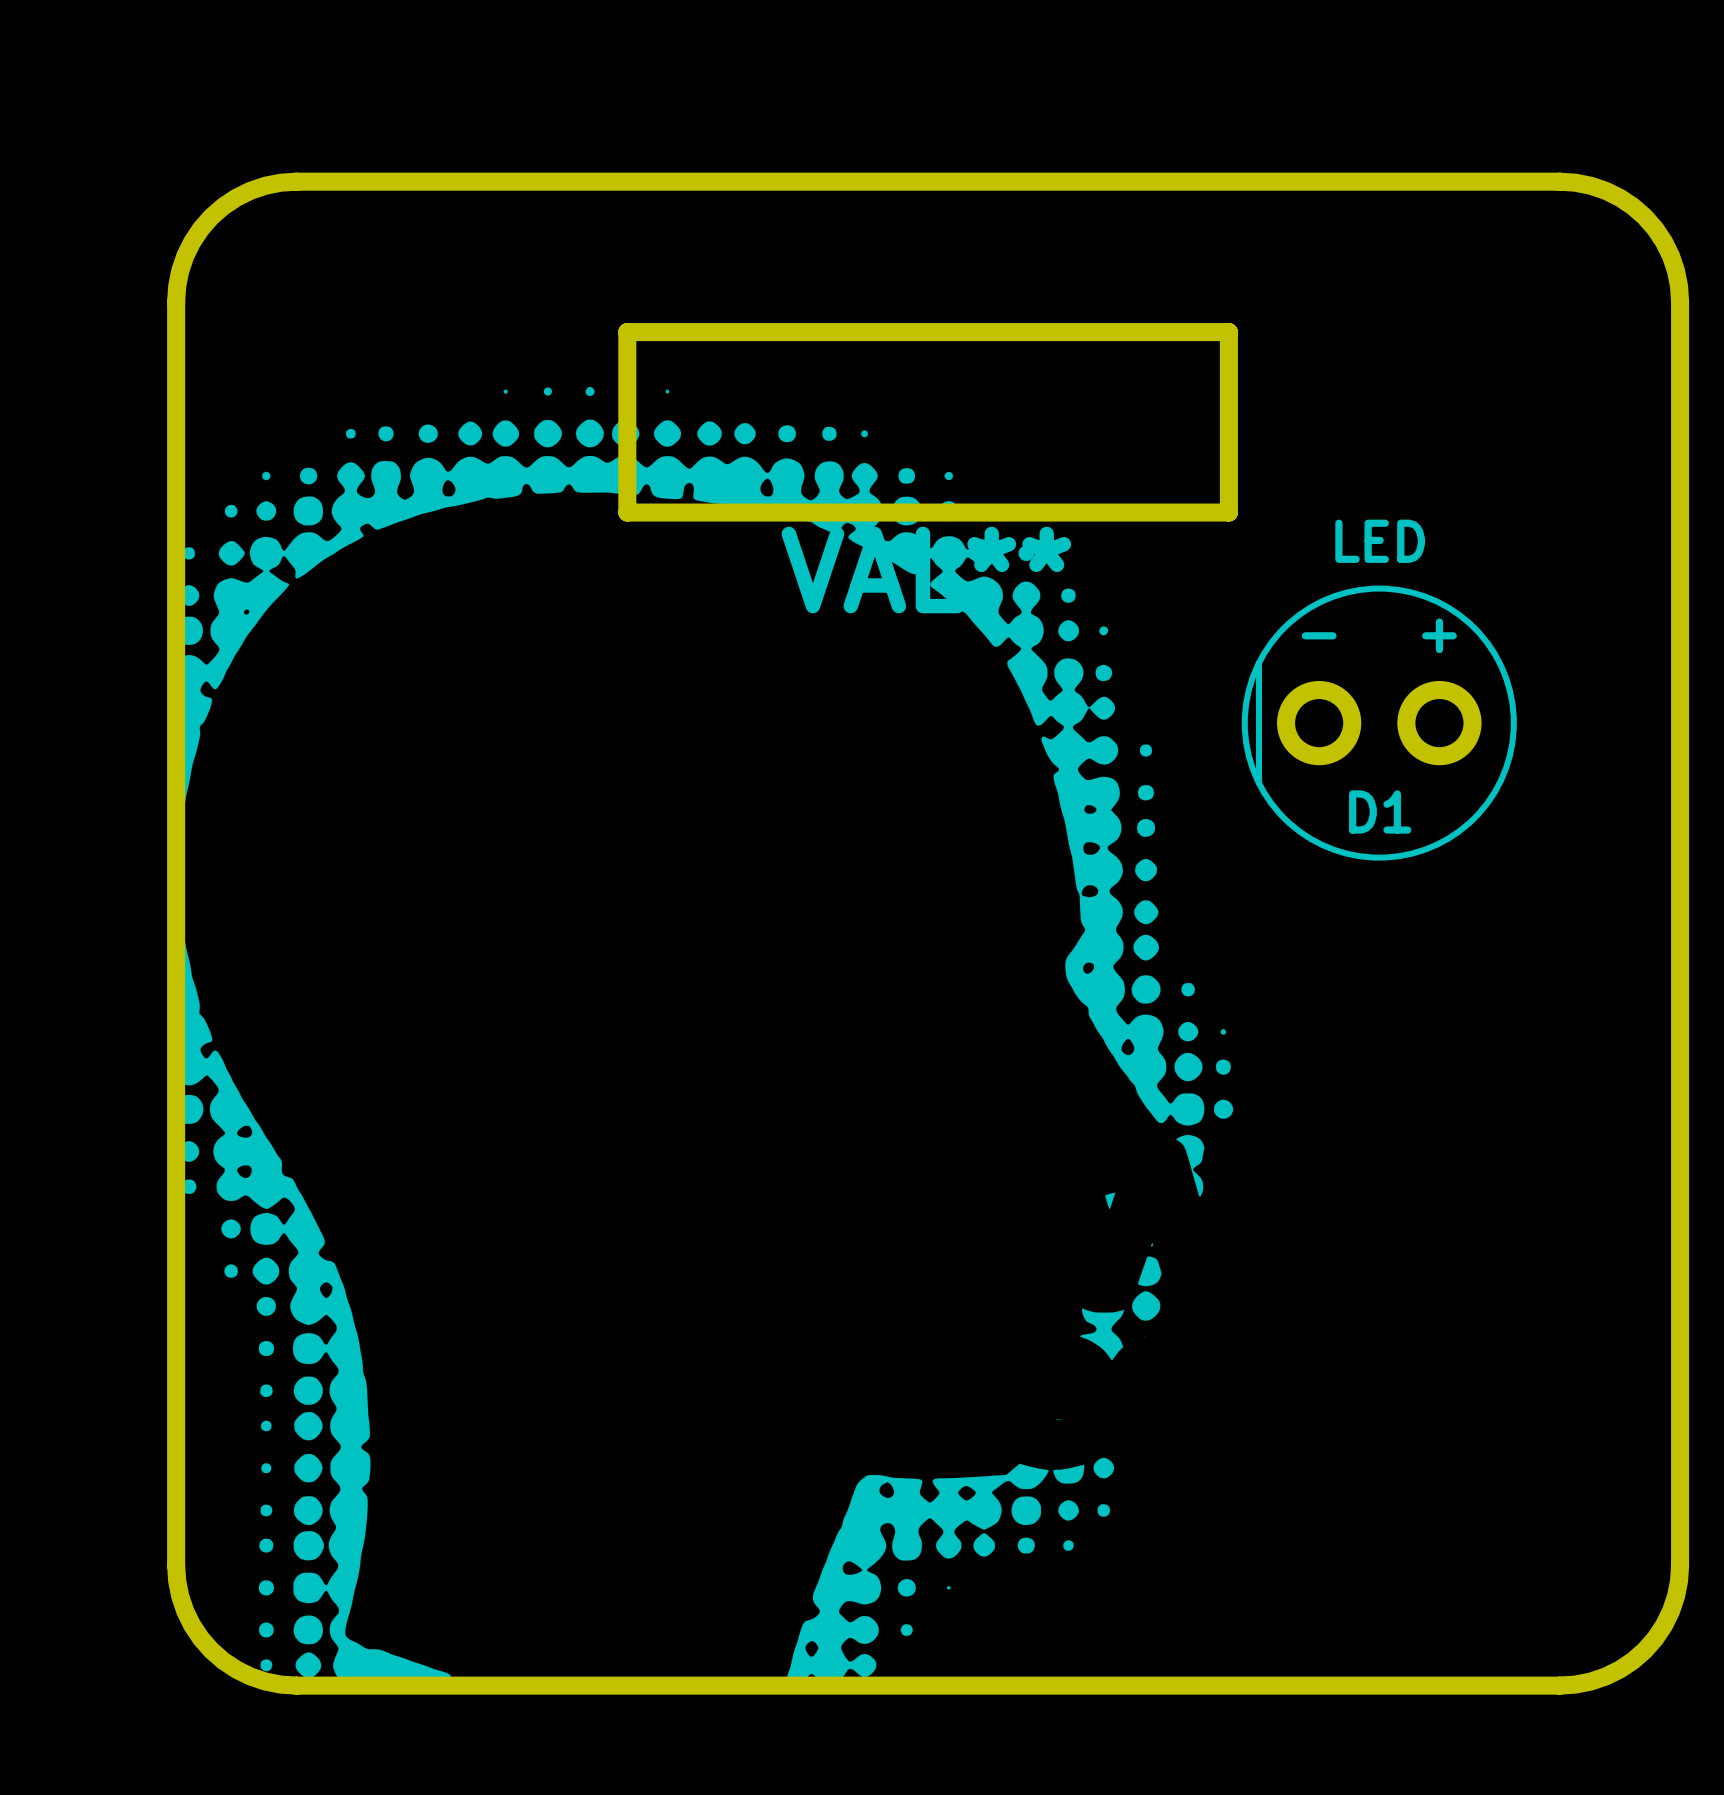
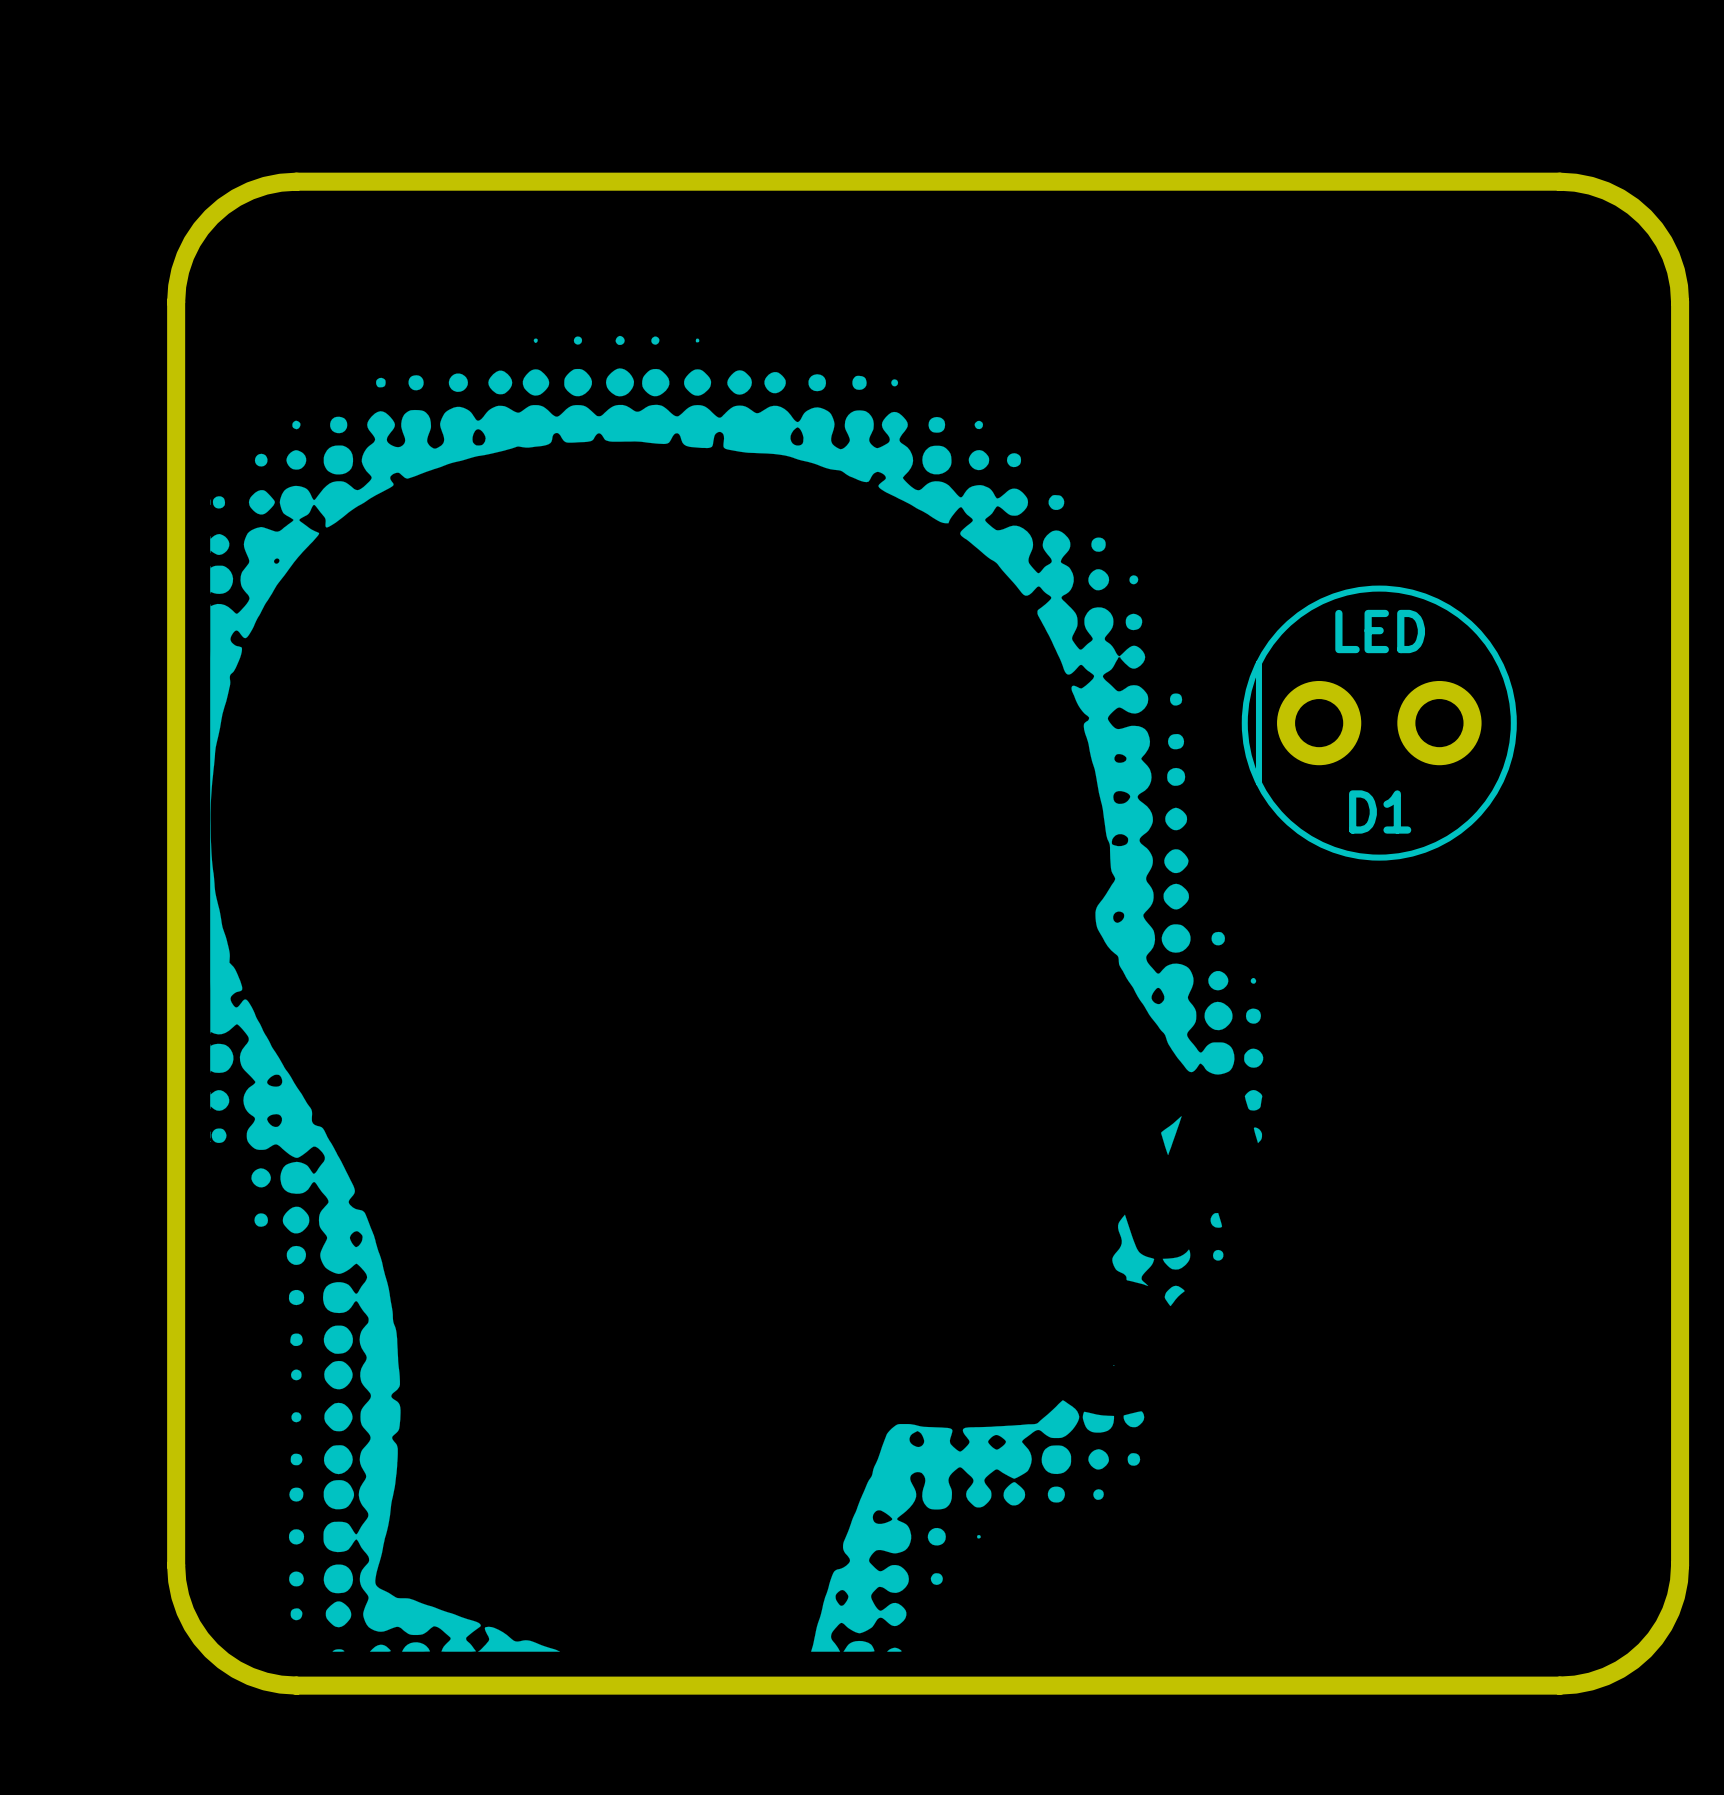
drawing: [179, 323, 1238, 1682] -> none
drawing: none -> [210, 335, 1264, 1652]
D1 value position: LED (1380, 541) -> LED (1380, 631)
D1 text: - (1319, 635) -> none
D1 text: + (1439, 635) -> none

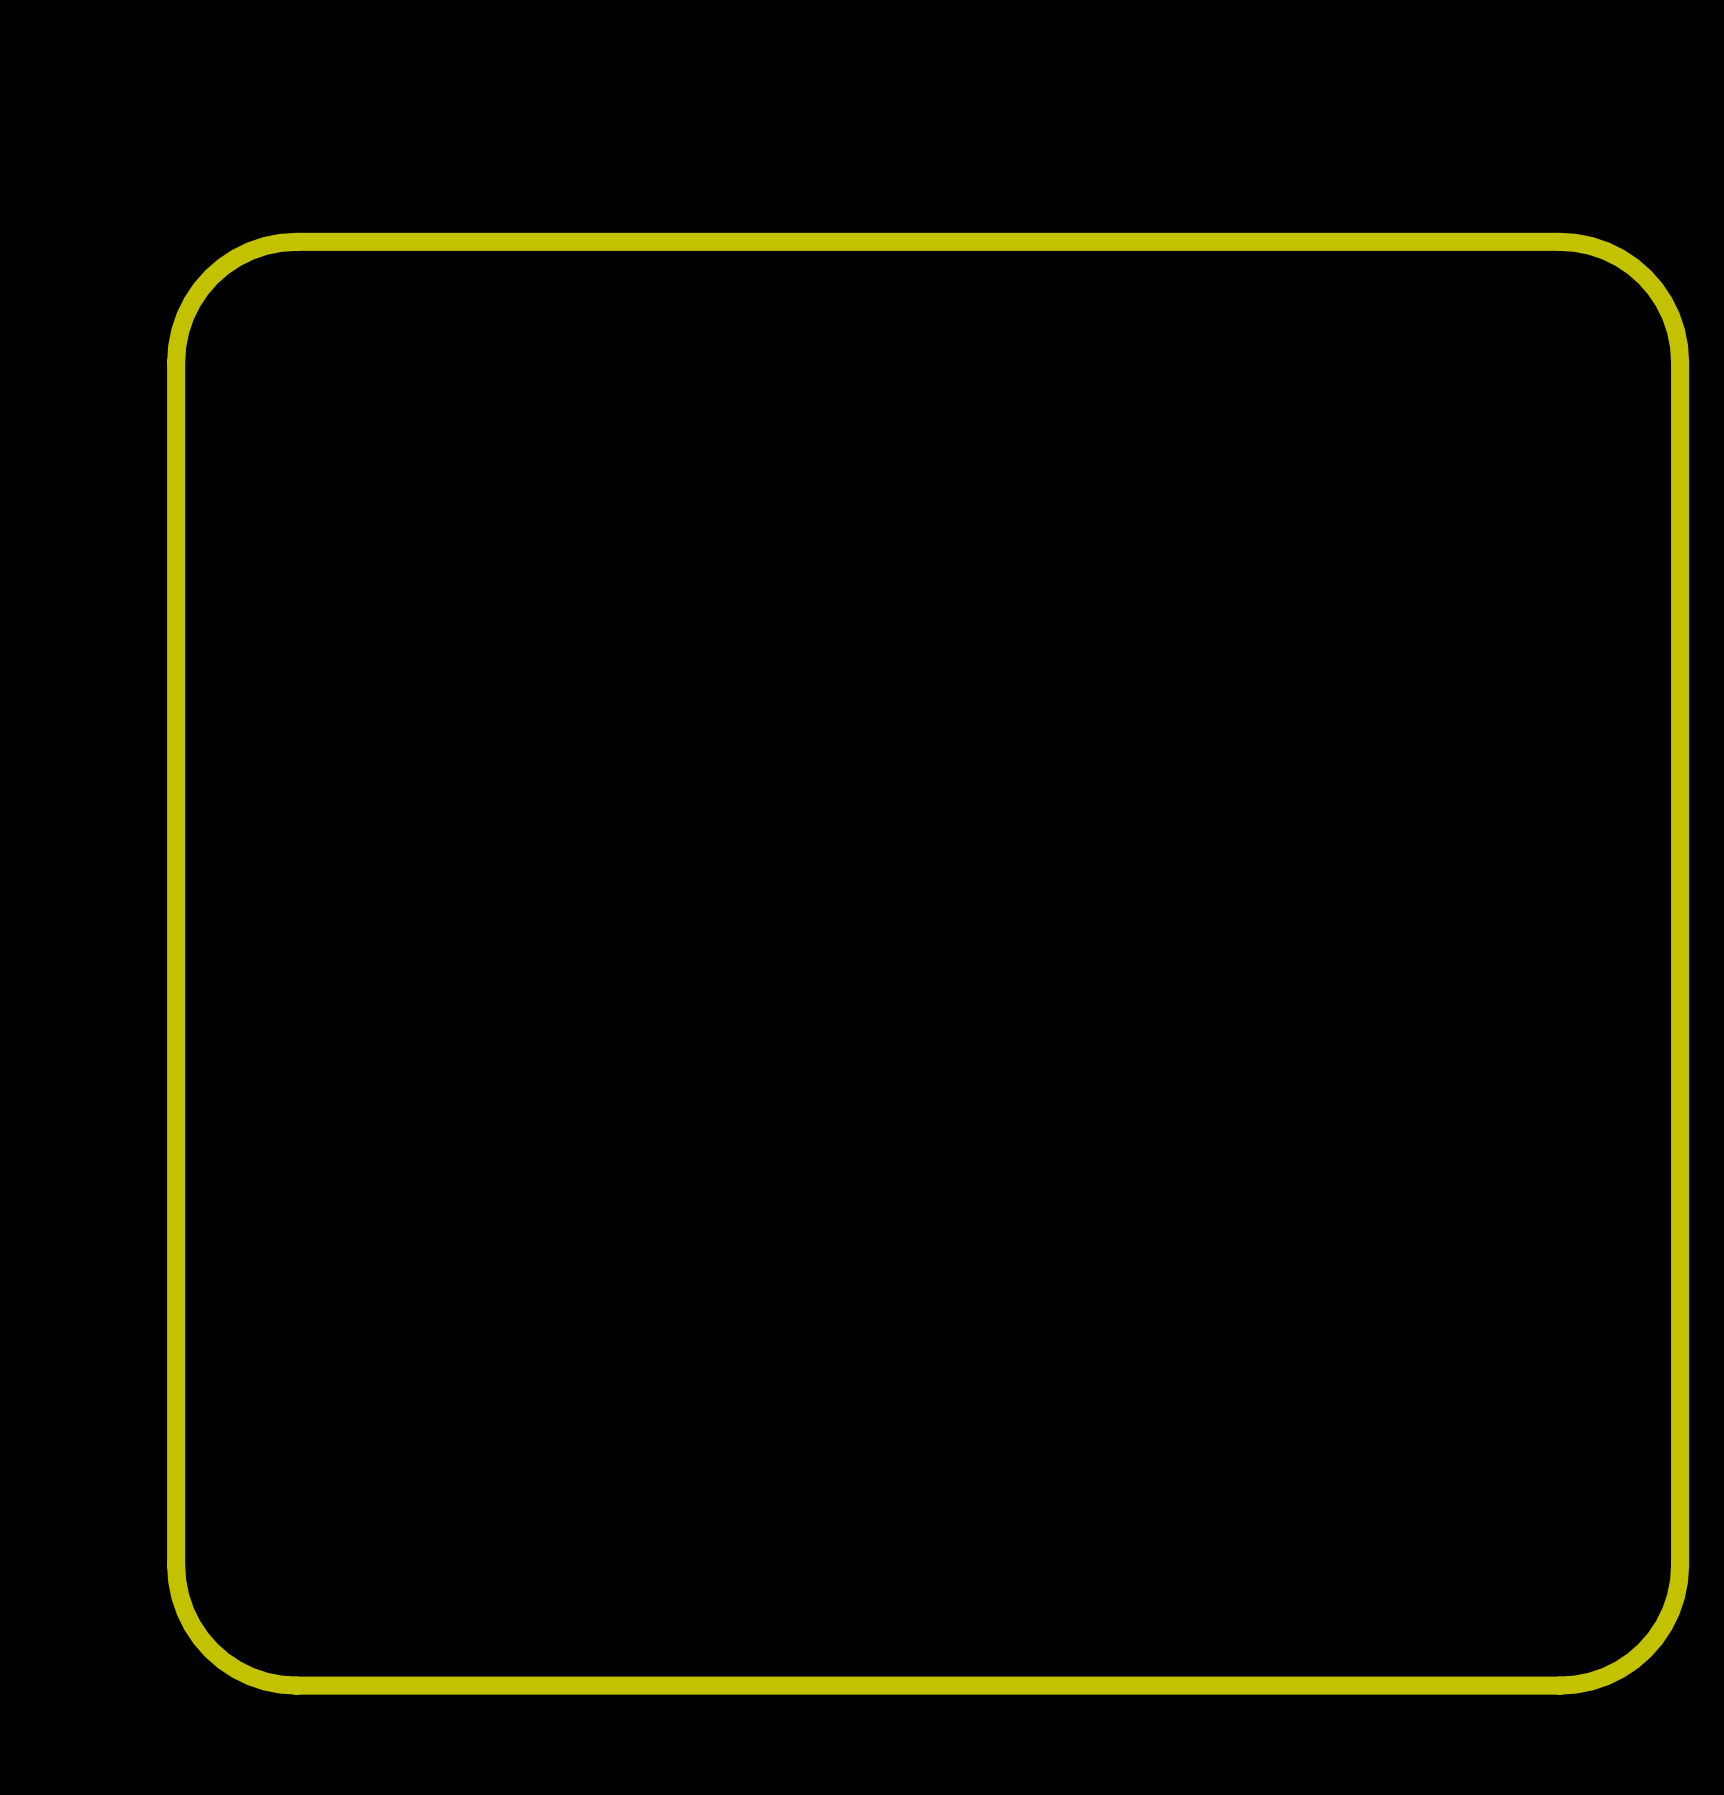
drawing: [210, 335, 1264, 1652] -> none
board edge: (176, 362) (177, 286) (185, 255) (192, 241) (211, 216) (236, 197) (265, 185) (296, 181) (1575, 182) (1605, 190) (1633, 206) (1644, 216) (1663, 241) (1675, 270) (1679, 286) (1680, 362) -> (176, 362) (177, 346) (185, 316) (201, 288) (211, 277) (223, 266) (250, 251) (265, 245) (296, 241) (1575, 242) (1605, 251) (1633, 266) (1644, 277) (1663, 301) (1670, 316) (1675, 331) (1680, 362)
D1: LED (1379, 723) -> none

